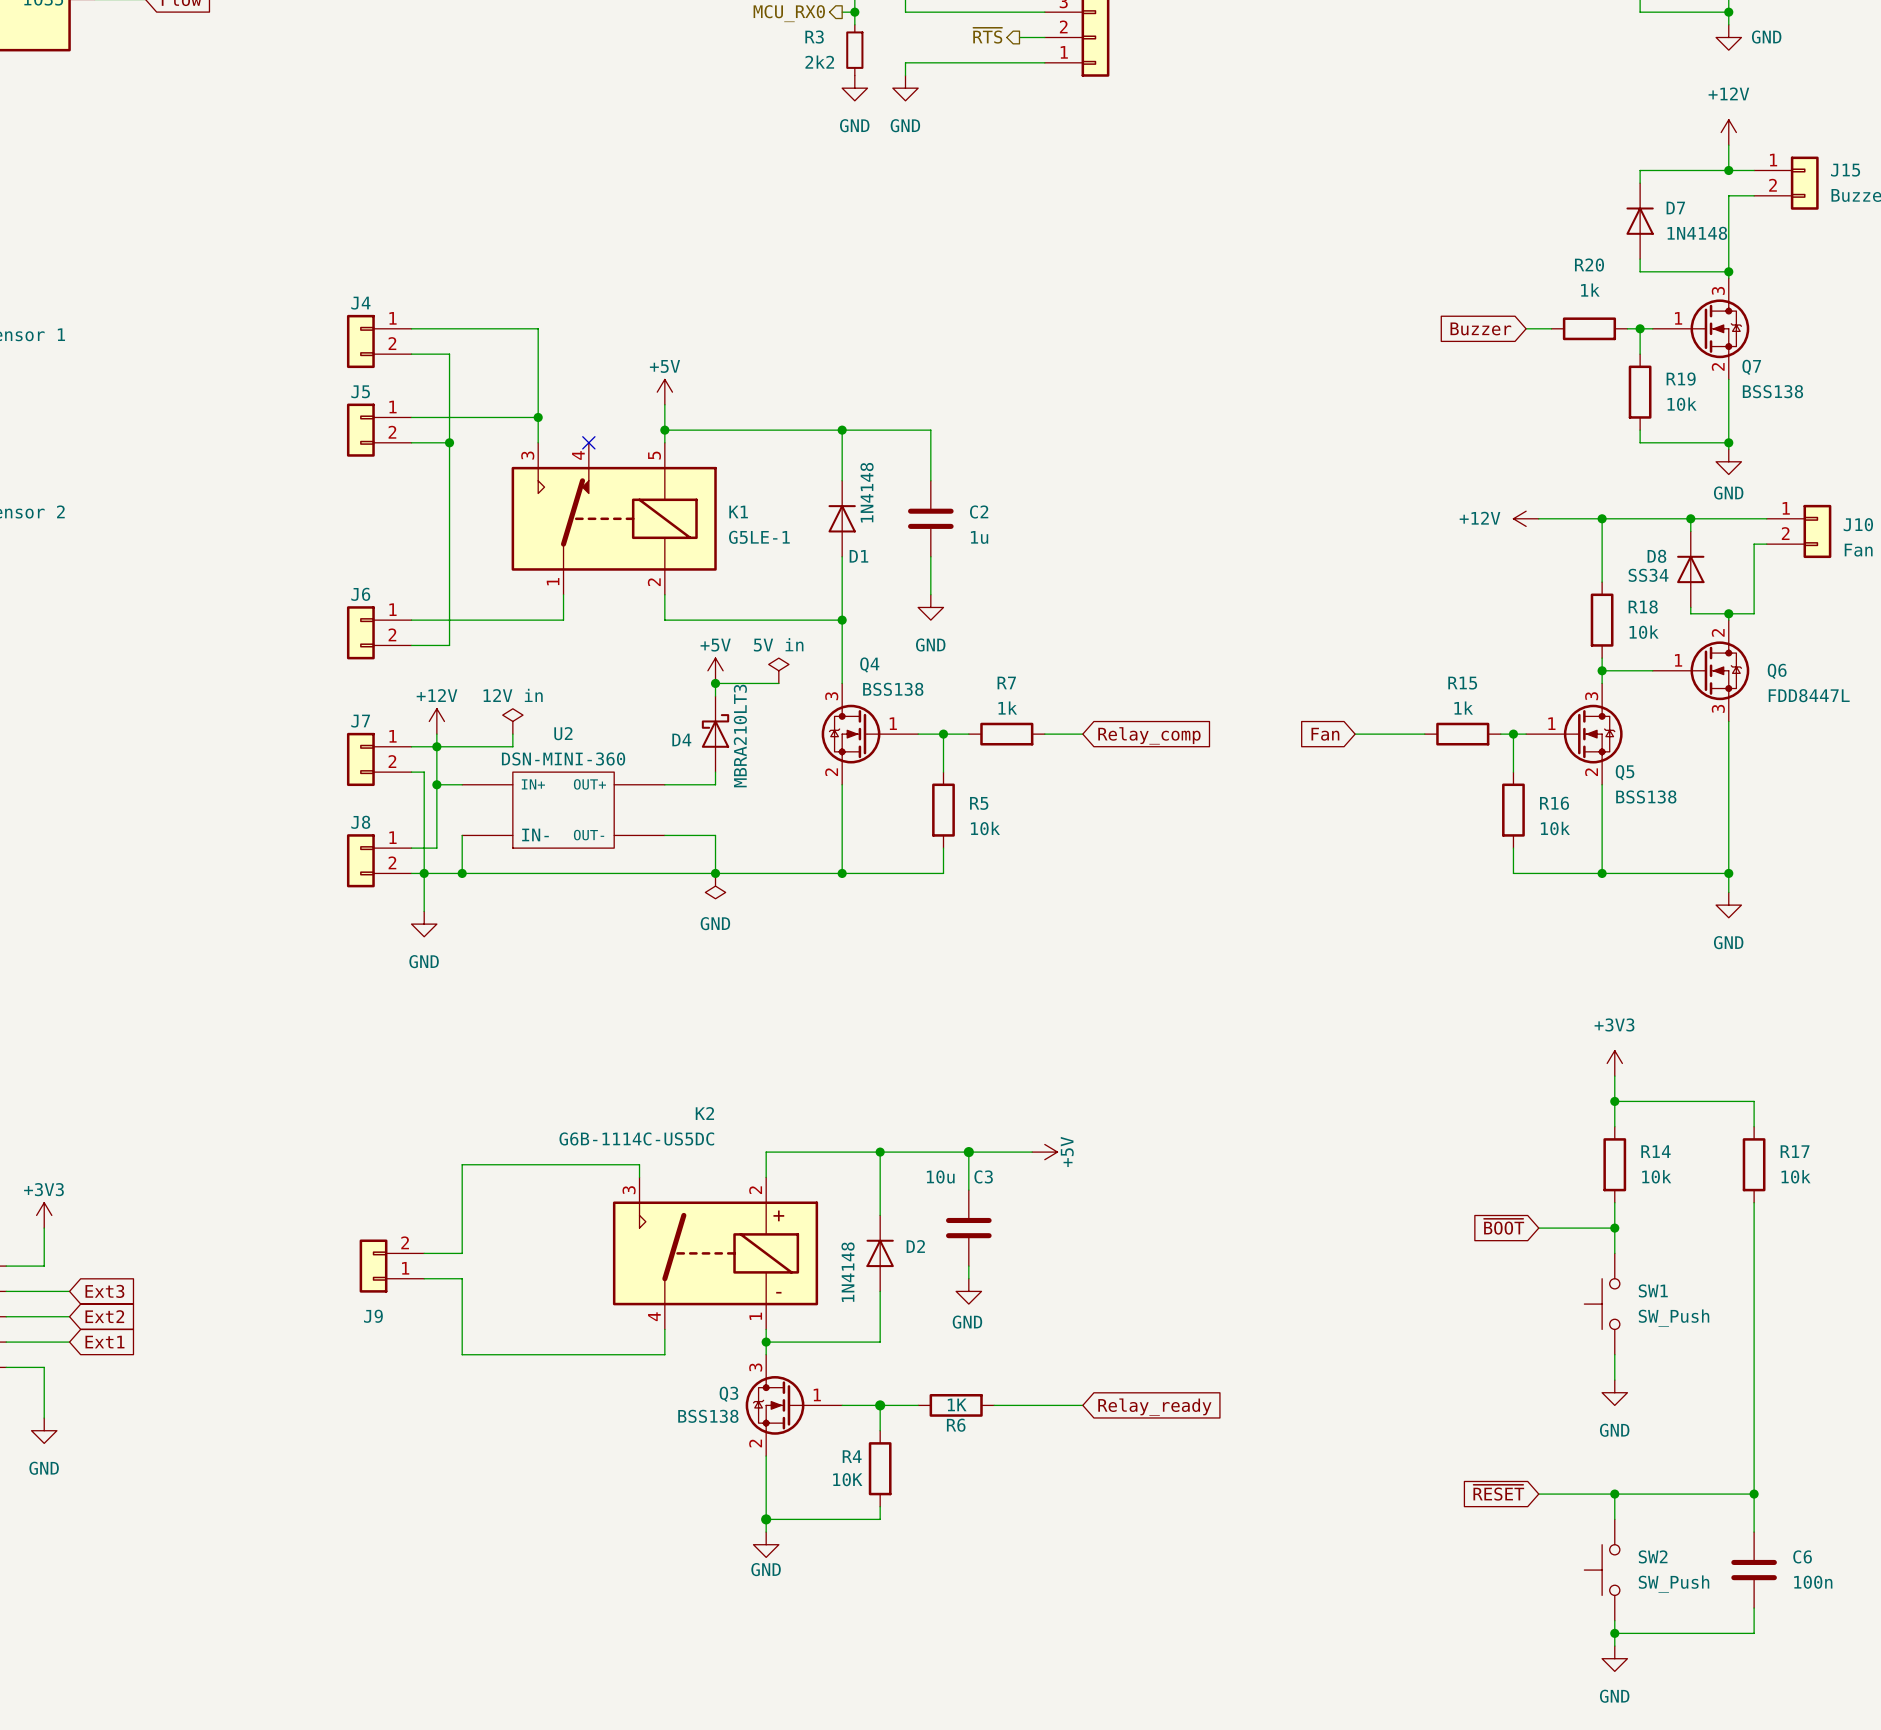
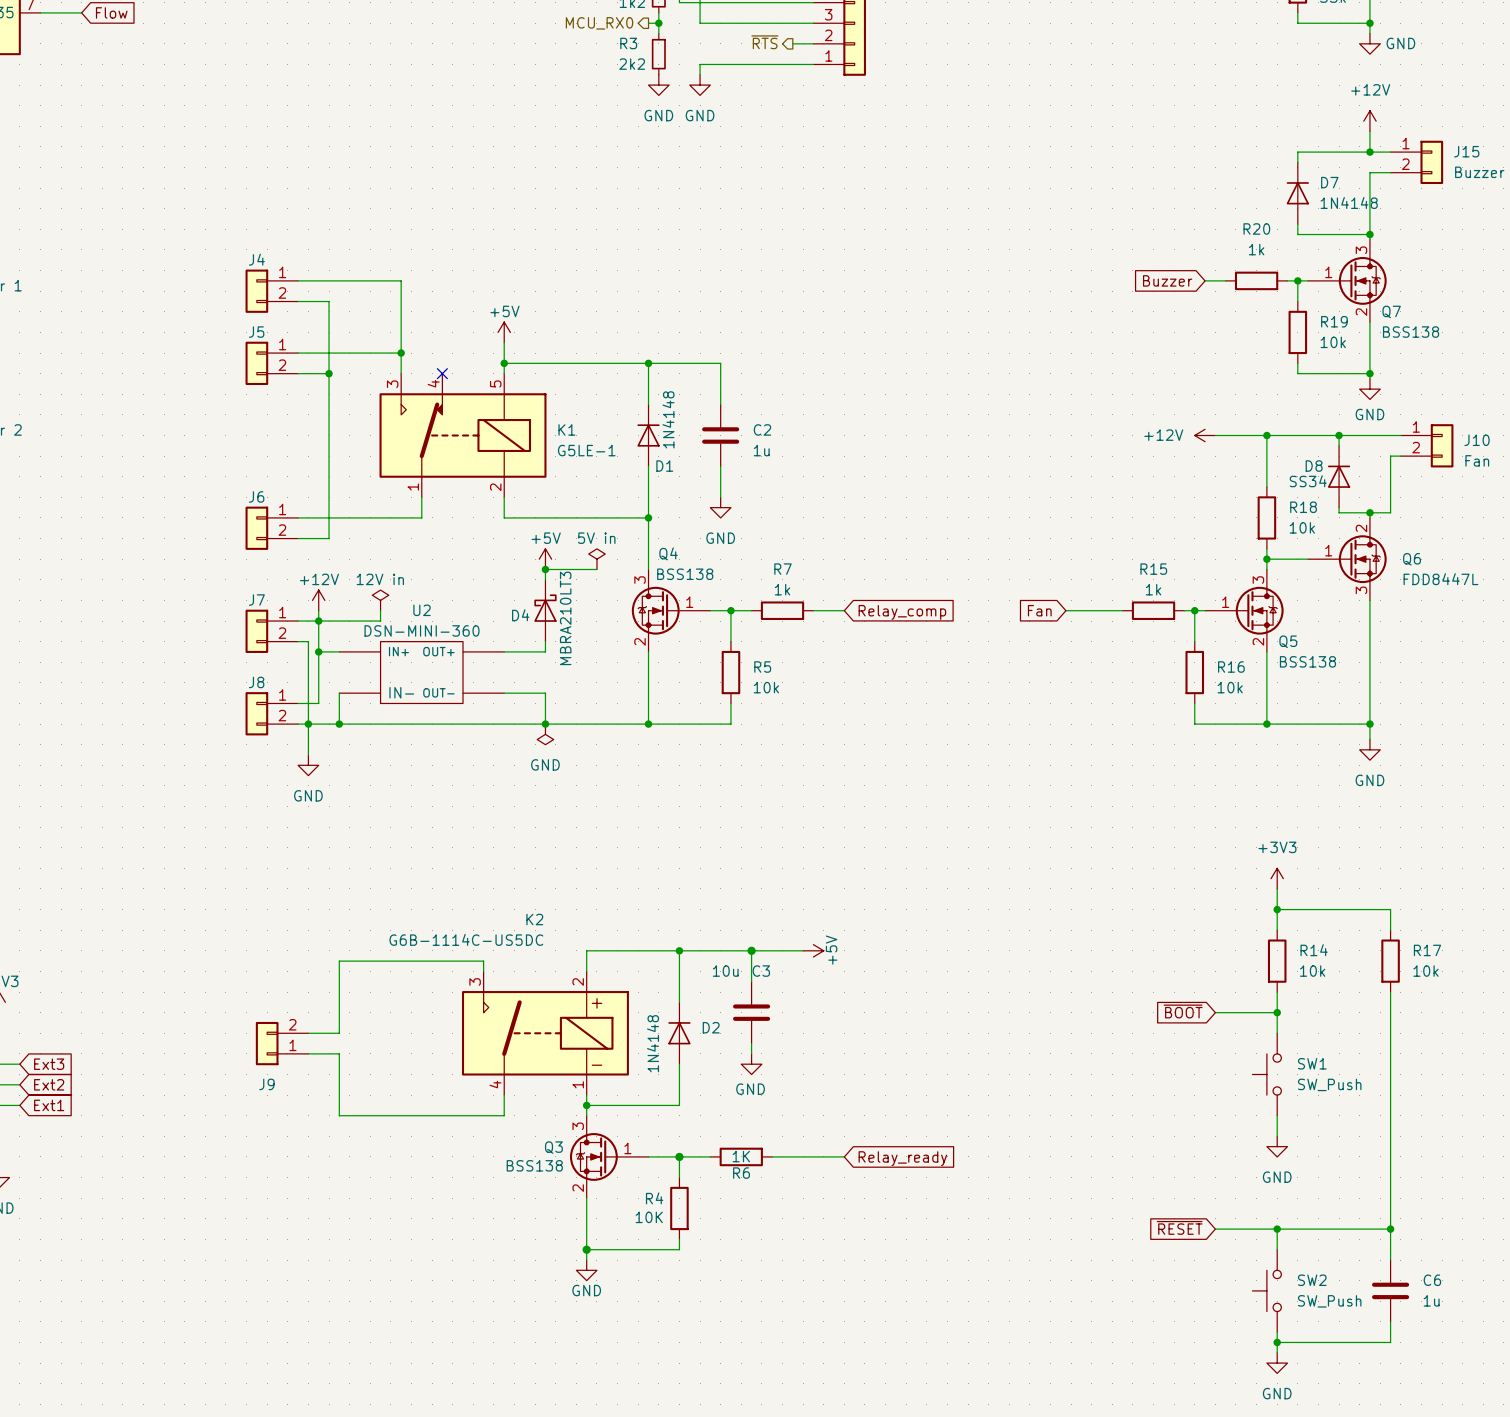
C6 value: 100n (1813, 1582) -> 1u (1431, 1300)

